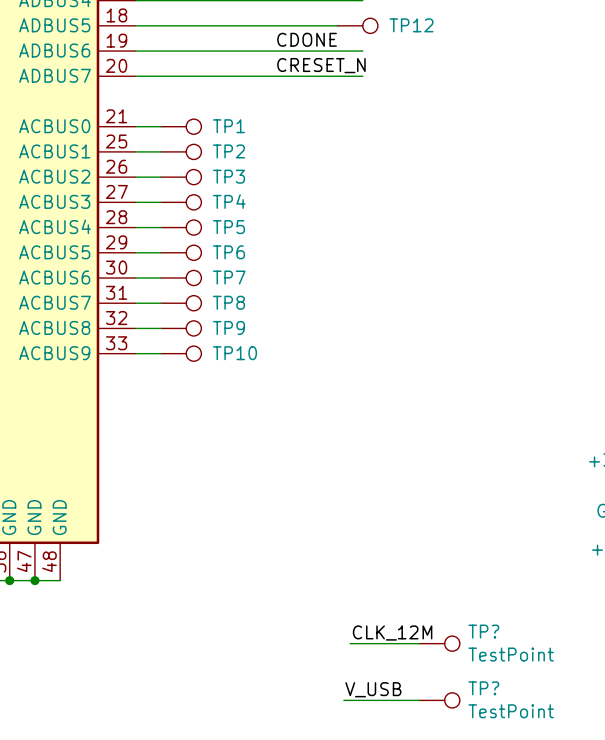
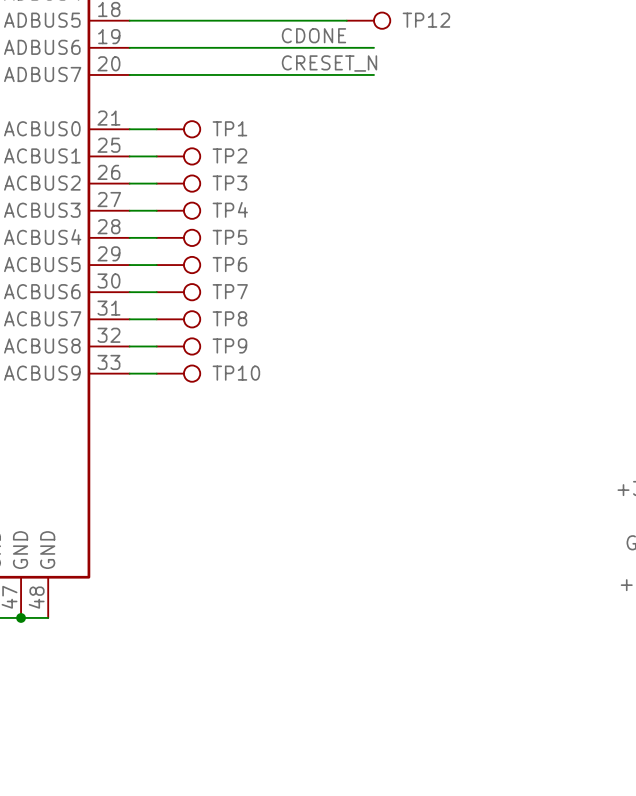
label: CLK_12M (392, 633) -> none
wire: (350, 643) (419, 643) -> none
TP?: TestPoint (439, 643) -> none
label: V_USB (373, 689) -> none
wire: (343, 700) (419, 700) -> none
TP?: TestPoint (439, 700) -> none

